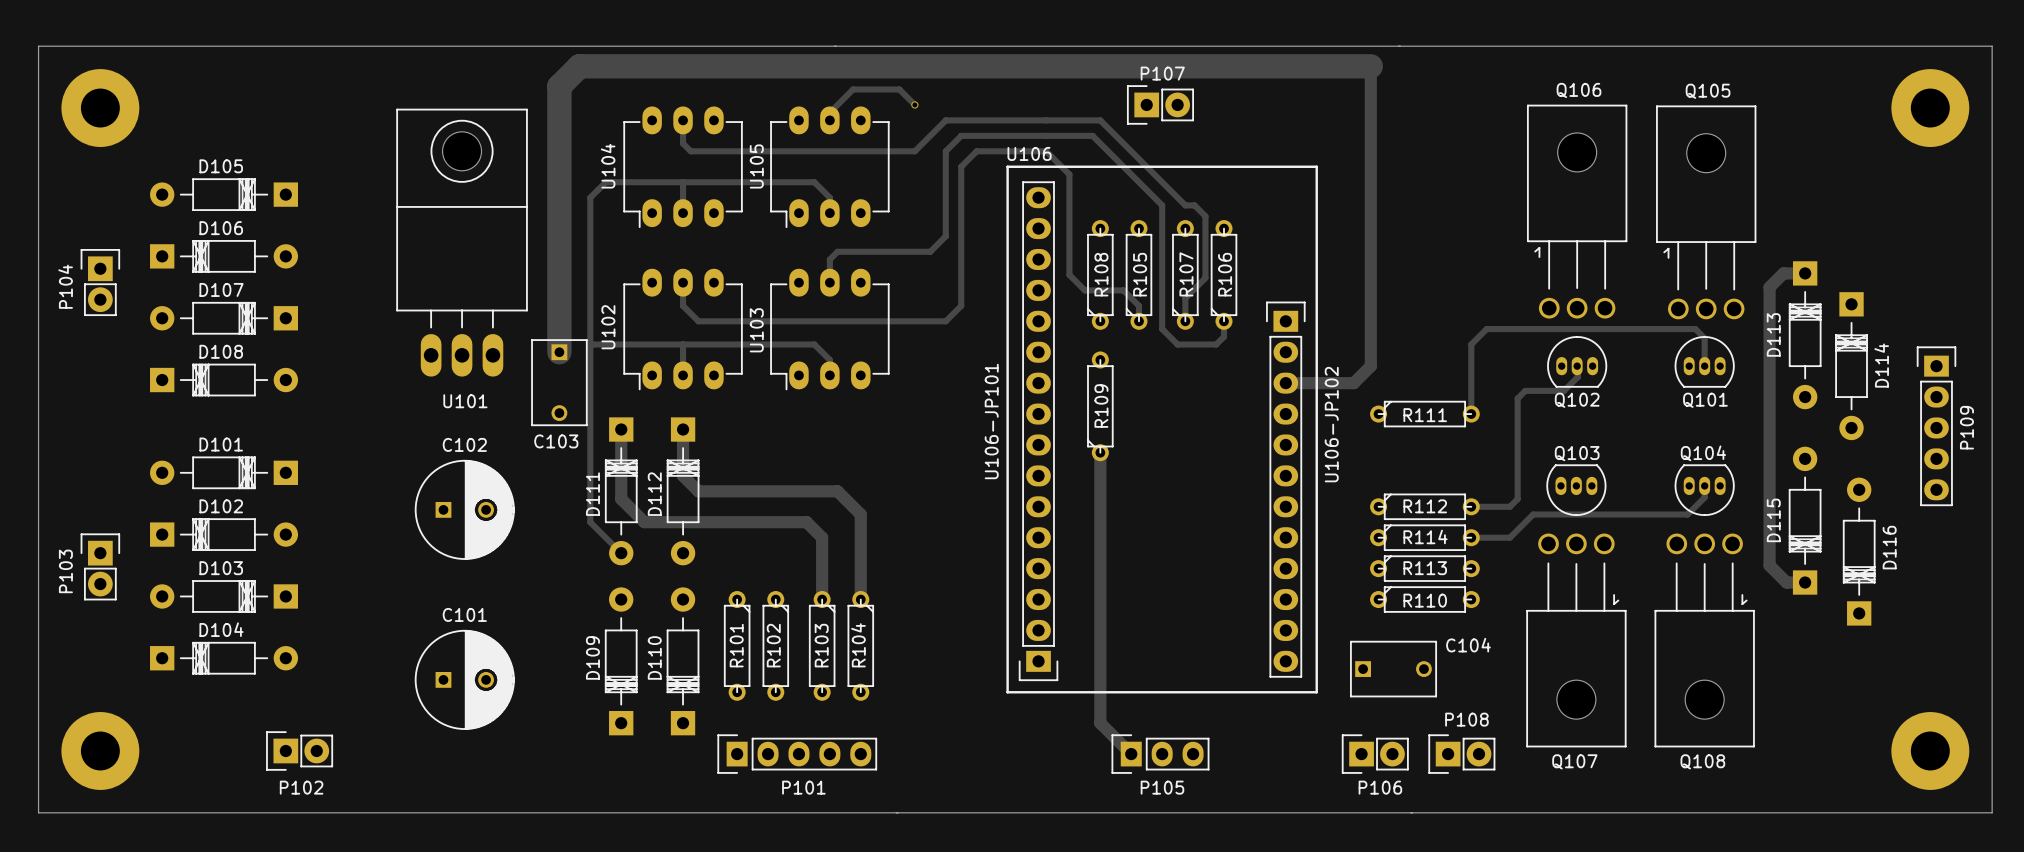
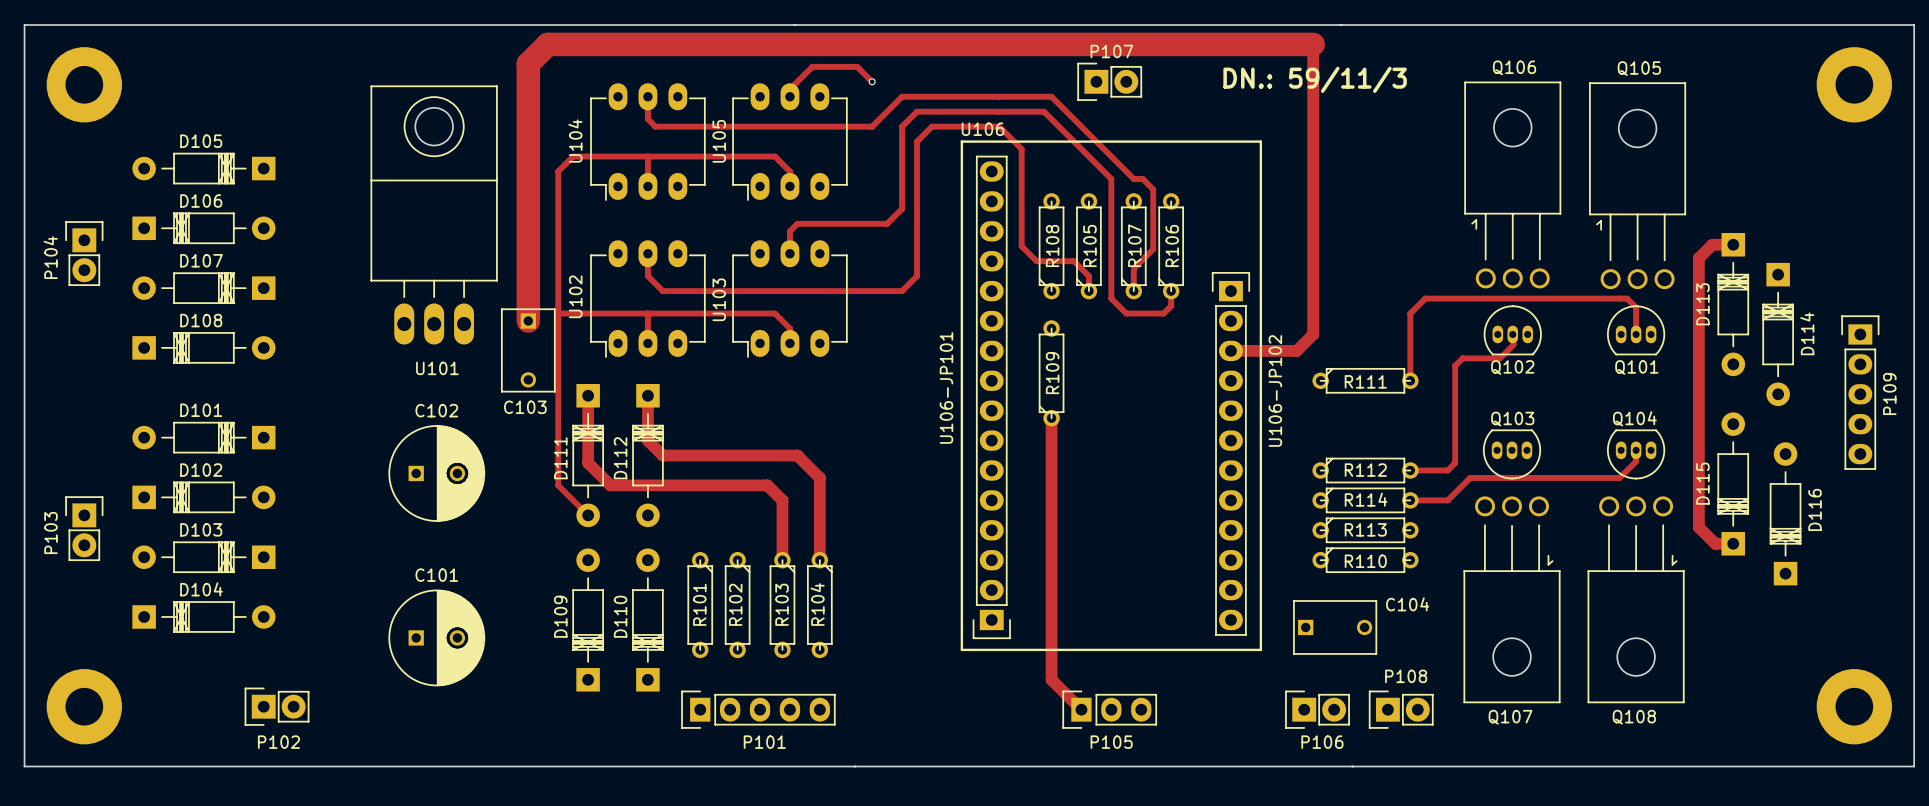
text: none -> DN.: 59/11/3 (1315, 79)

